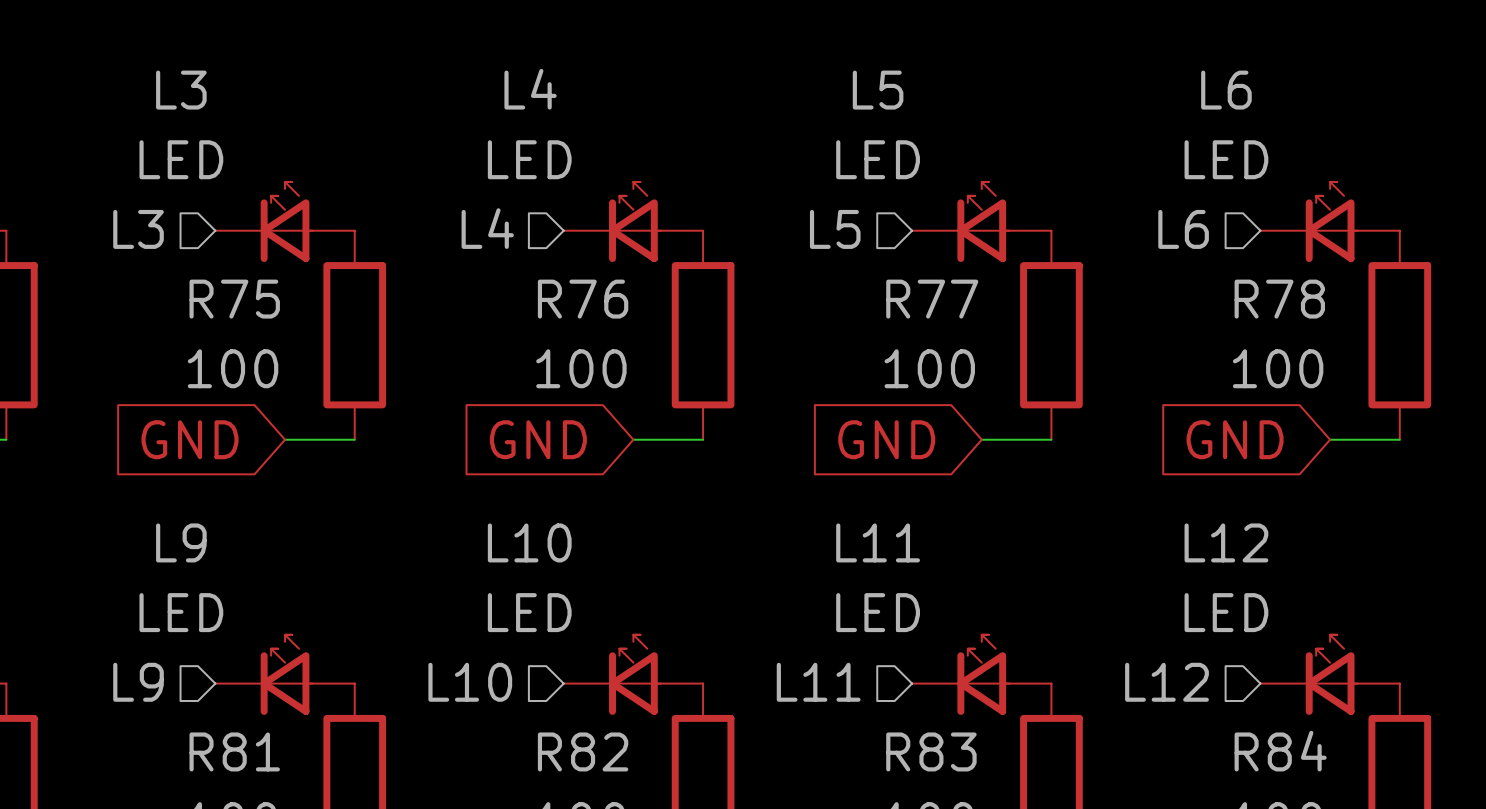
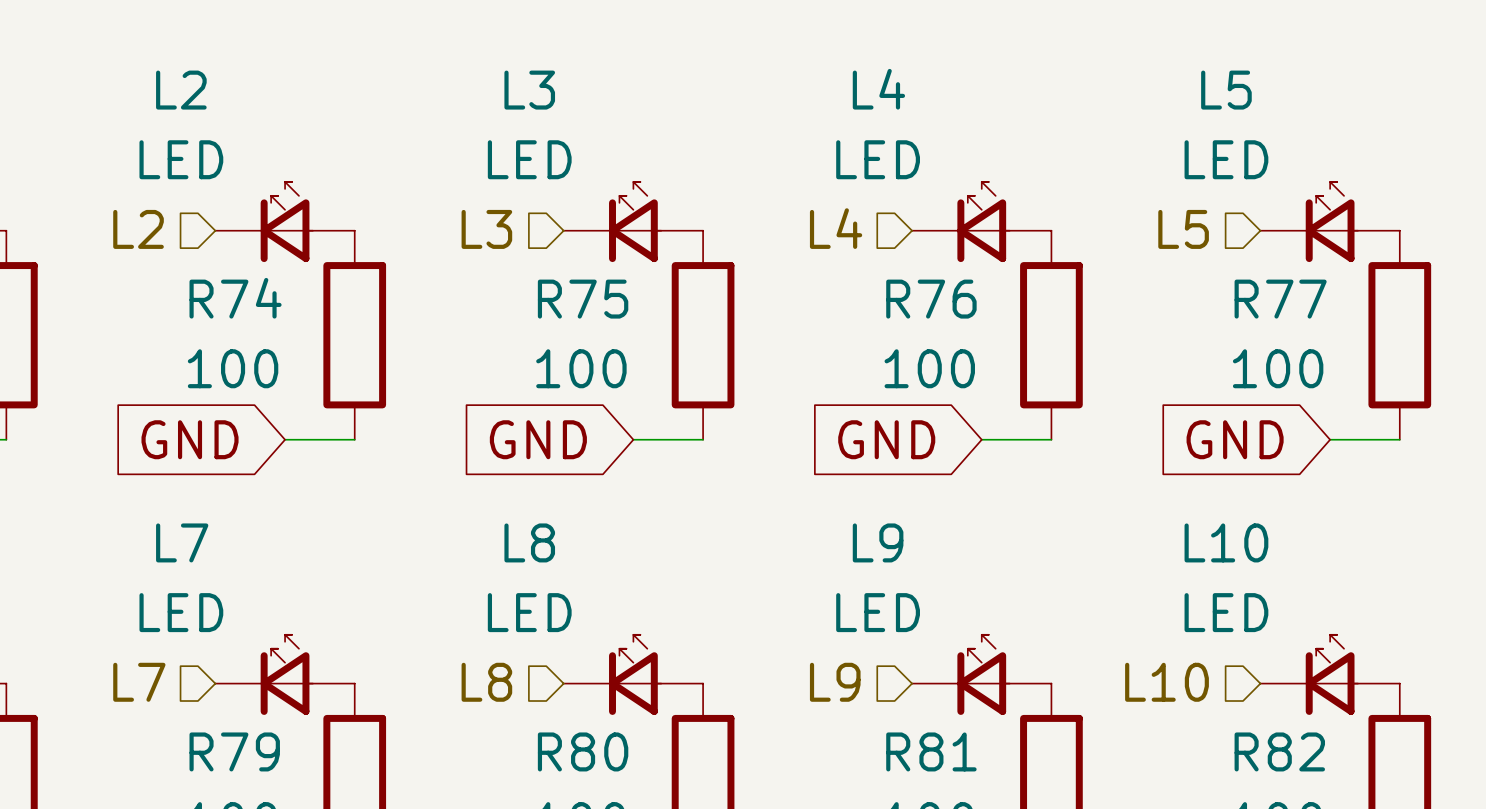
L4 name: L4 (530, 89) -> L3 (529, 90)
L3 name: L3 (181, 90) -> L2 (181, 90)
L5 name: L5 (878, 90) -> L4 (878, 89)
L6 name: L6 (1226, 90) -> L5 (1226, 90)
hierarchical label: L4 (487, 228) -> L3 (486, 229)
hierarchical label: L3 (138, 229) -> L2 (138, 229)
hierarchical label: L5 (835, 229) -> L4 (836, 228)
hierarchical label: L6 (1183, 229) -> L5 (1183, 229)
R75 name: R75 (234, 299) -> R74 (235, 298)
R76 name: R76 (583, 299) -> R75 (583, 299)
R77 name: R77 (932, 299) -> R76 (931, 299)
R78 name: R78 (1279, 299) -> R77 (1280, 299)
L9 name: L9 (181, 542) -> L7 (182, 542)
L10 name: L10 (529, 542) -> L8 (529, 542)
L11 name: L11 (878, 542) -> L9 (878, 542)
L12 name: L12 (1226, 542) -> L10 (1226, 542)
hierarchical label: L9 (138, 682) -> L7 (139, 682)
hierarchical label: L10 (470, 682) -> L8 (486, 682)
hierarchical label: L11 (818, 682) -> L9 (835, 682)
hierarchical label: L12 (1167, 682) -> L10 (1167, 682)
R81 name: R81 (234, 751) -> R79 (234, 751)
R82 name: R82 (583, 751) -> R80 (583, 751)
R83 name: R83 (931, 751) -> R81 (931, 751)
R84 name: R84 (1280, 751) -> R82 (1279, 751)

